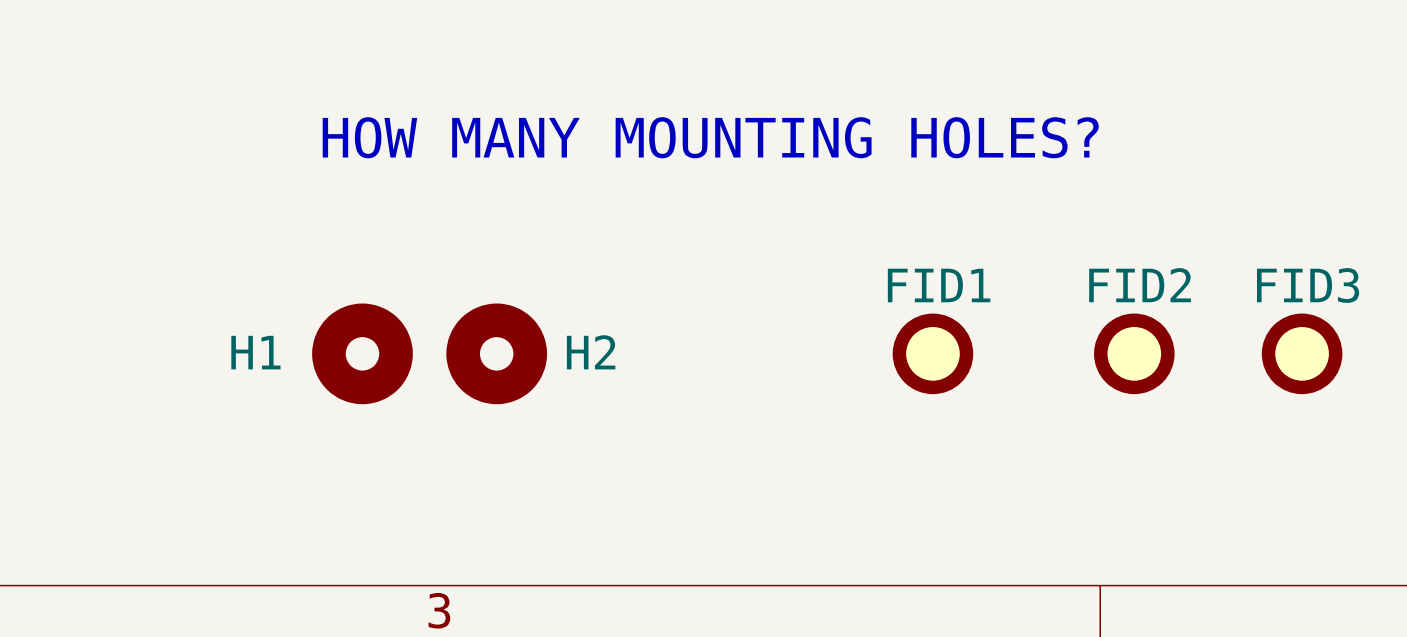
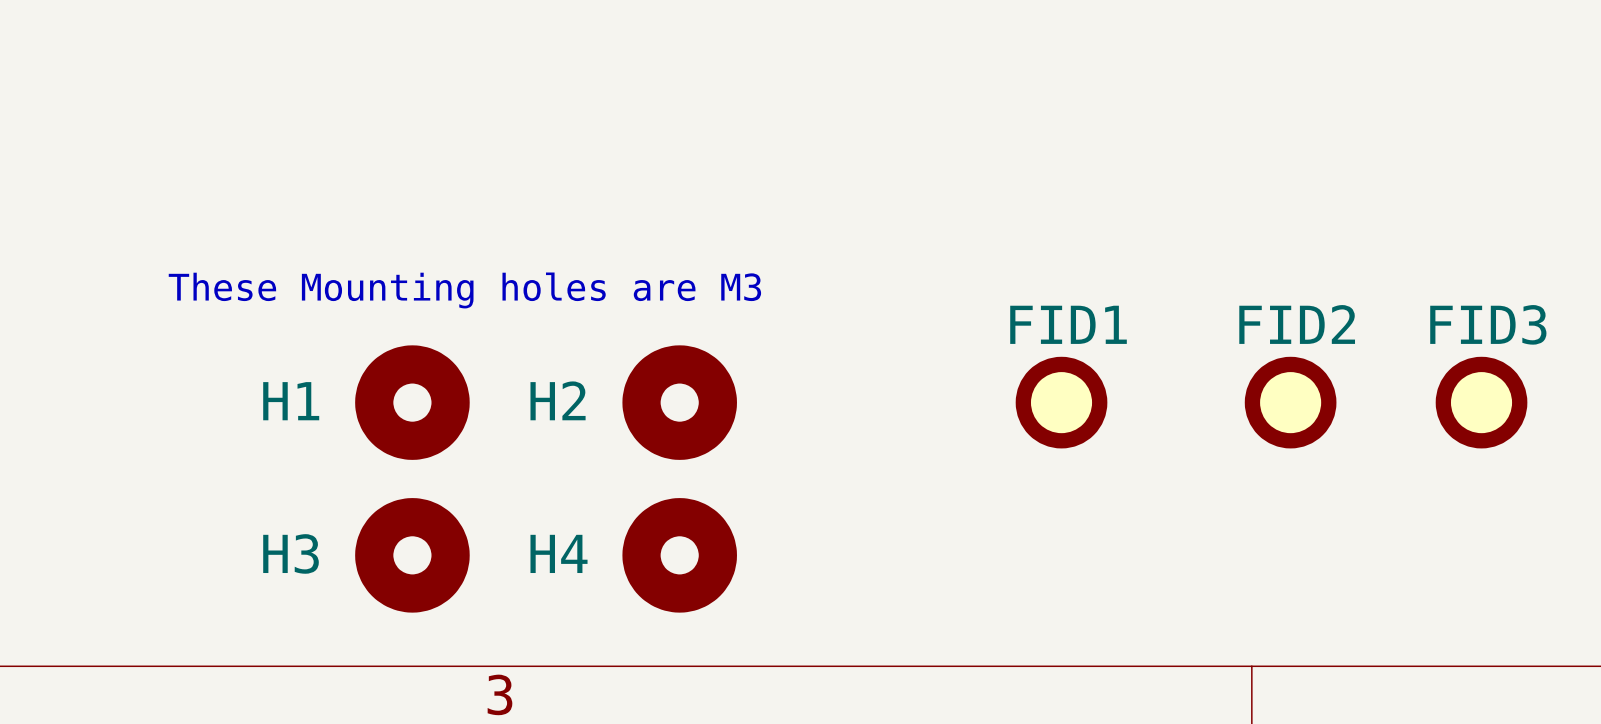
text: HOW MANY MOUNTING HOLES? (710, 137) -> none
text: none -> These Mounting holes are M3 (464, 290)
H2 name position: H2 (591, 352) -> H2 (558, 400)
H2 position: (496, 353) -> (679, 402)
H3: none -> (412, 555)
H4: none -> (679, 555)

